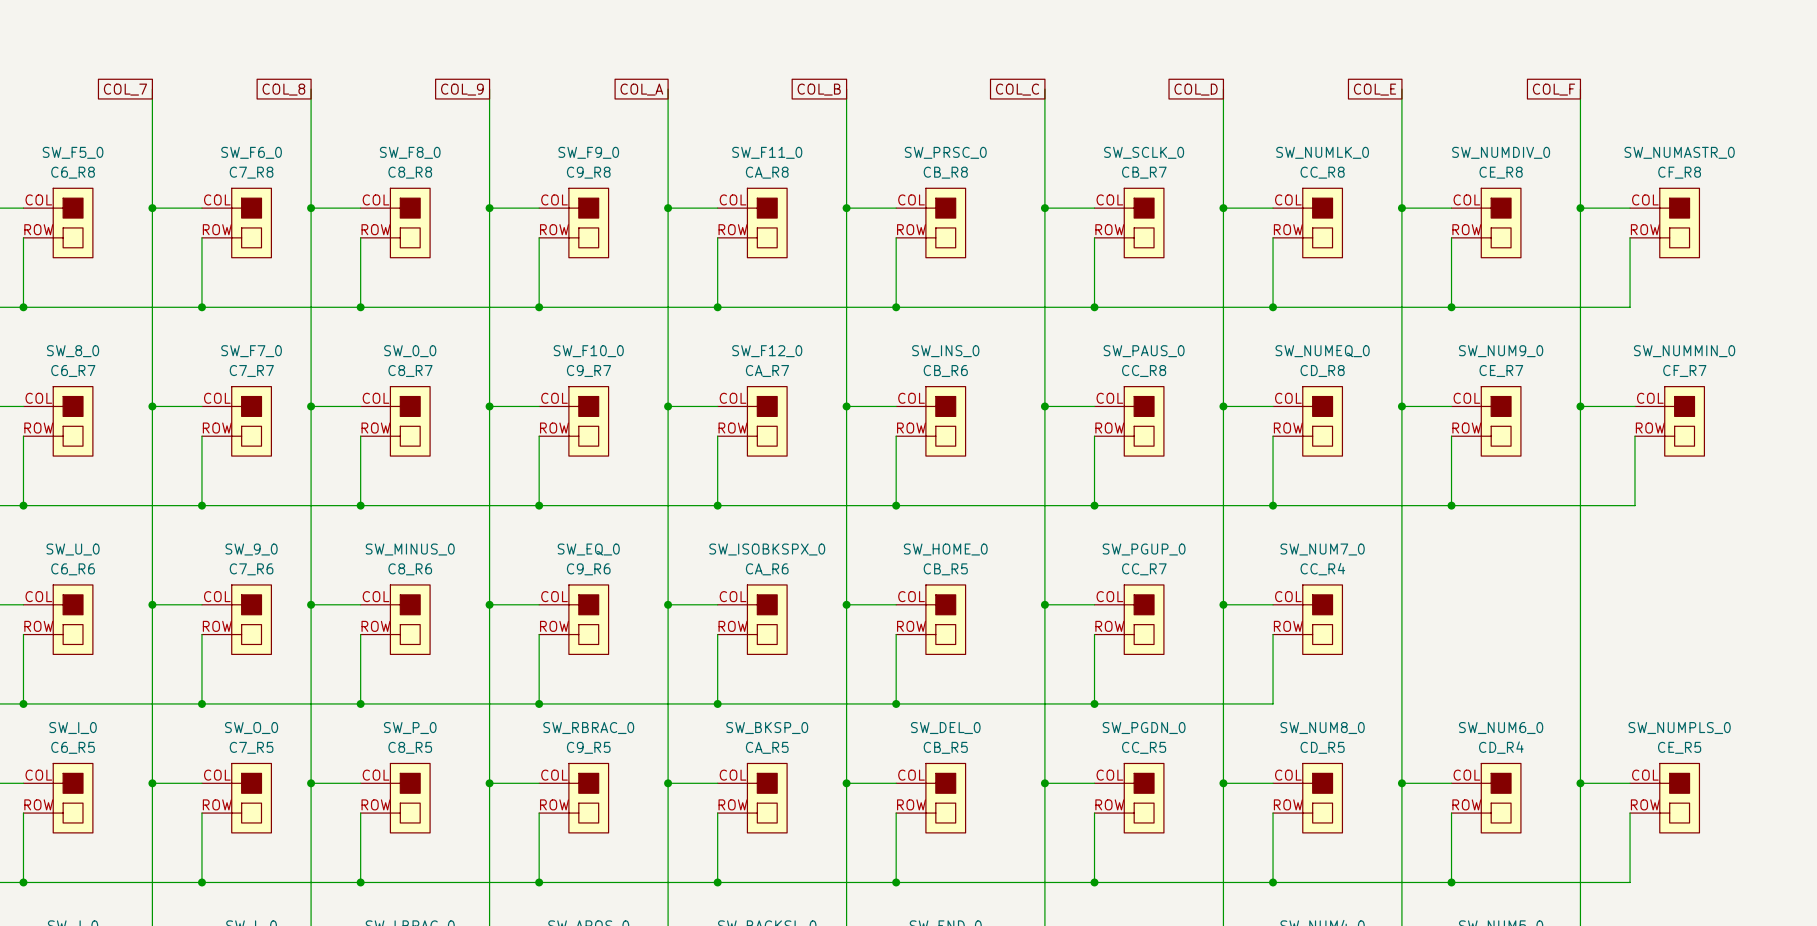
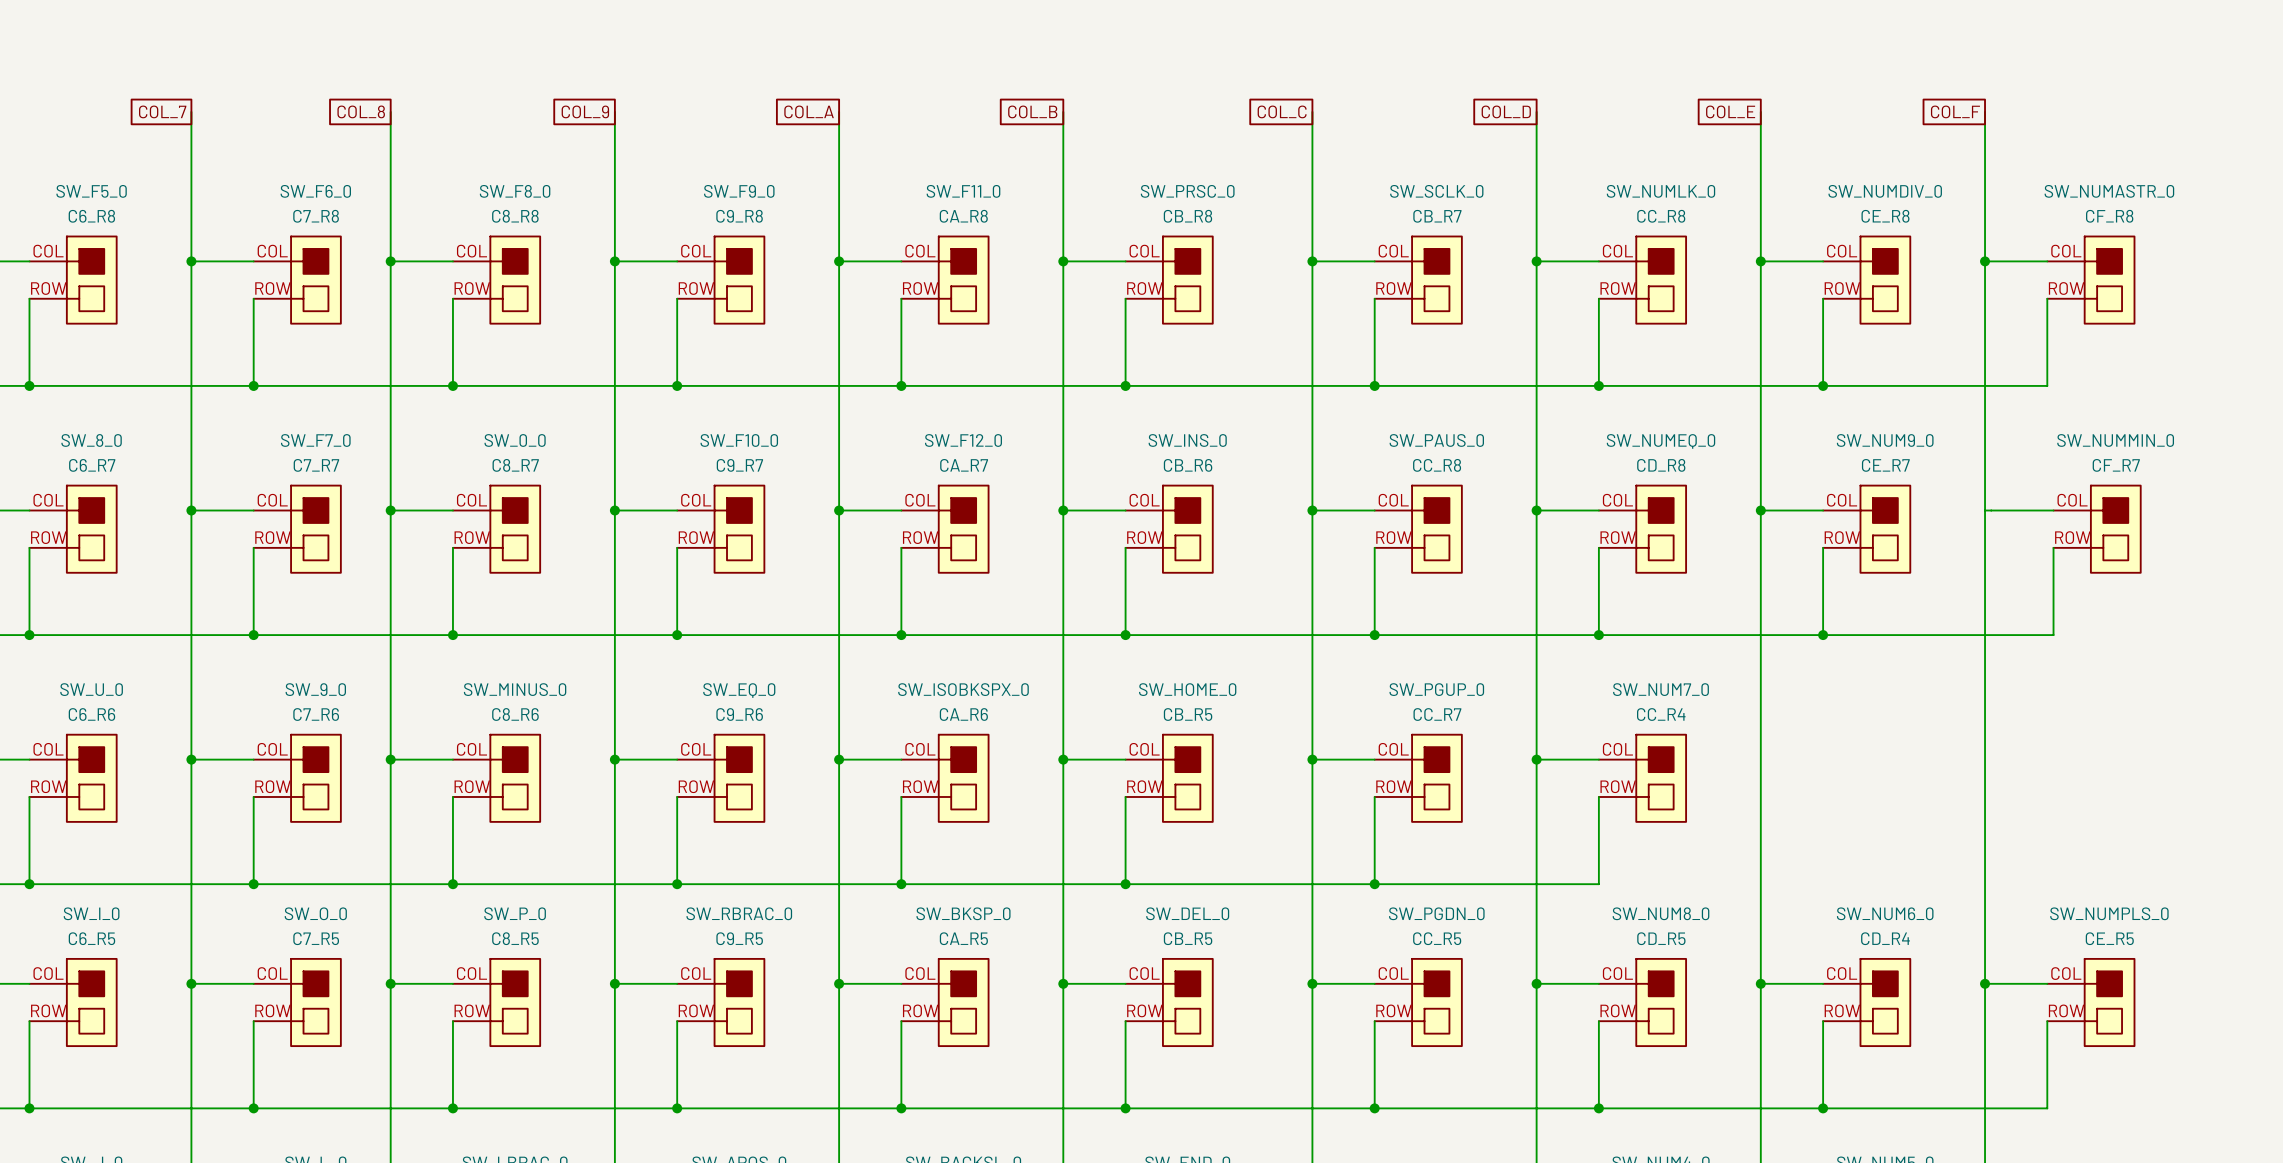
junction: (1580, 406) -> none

